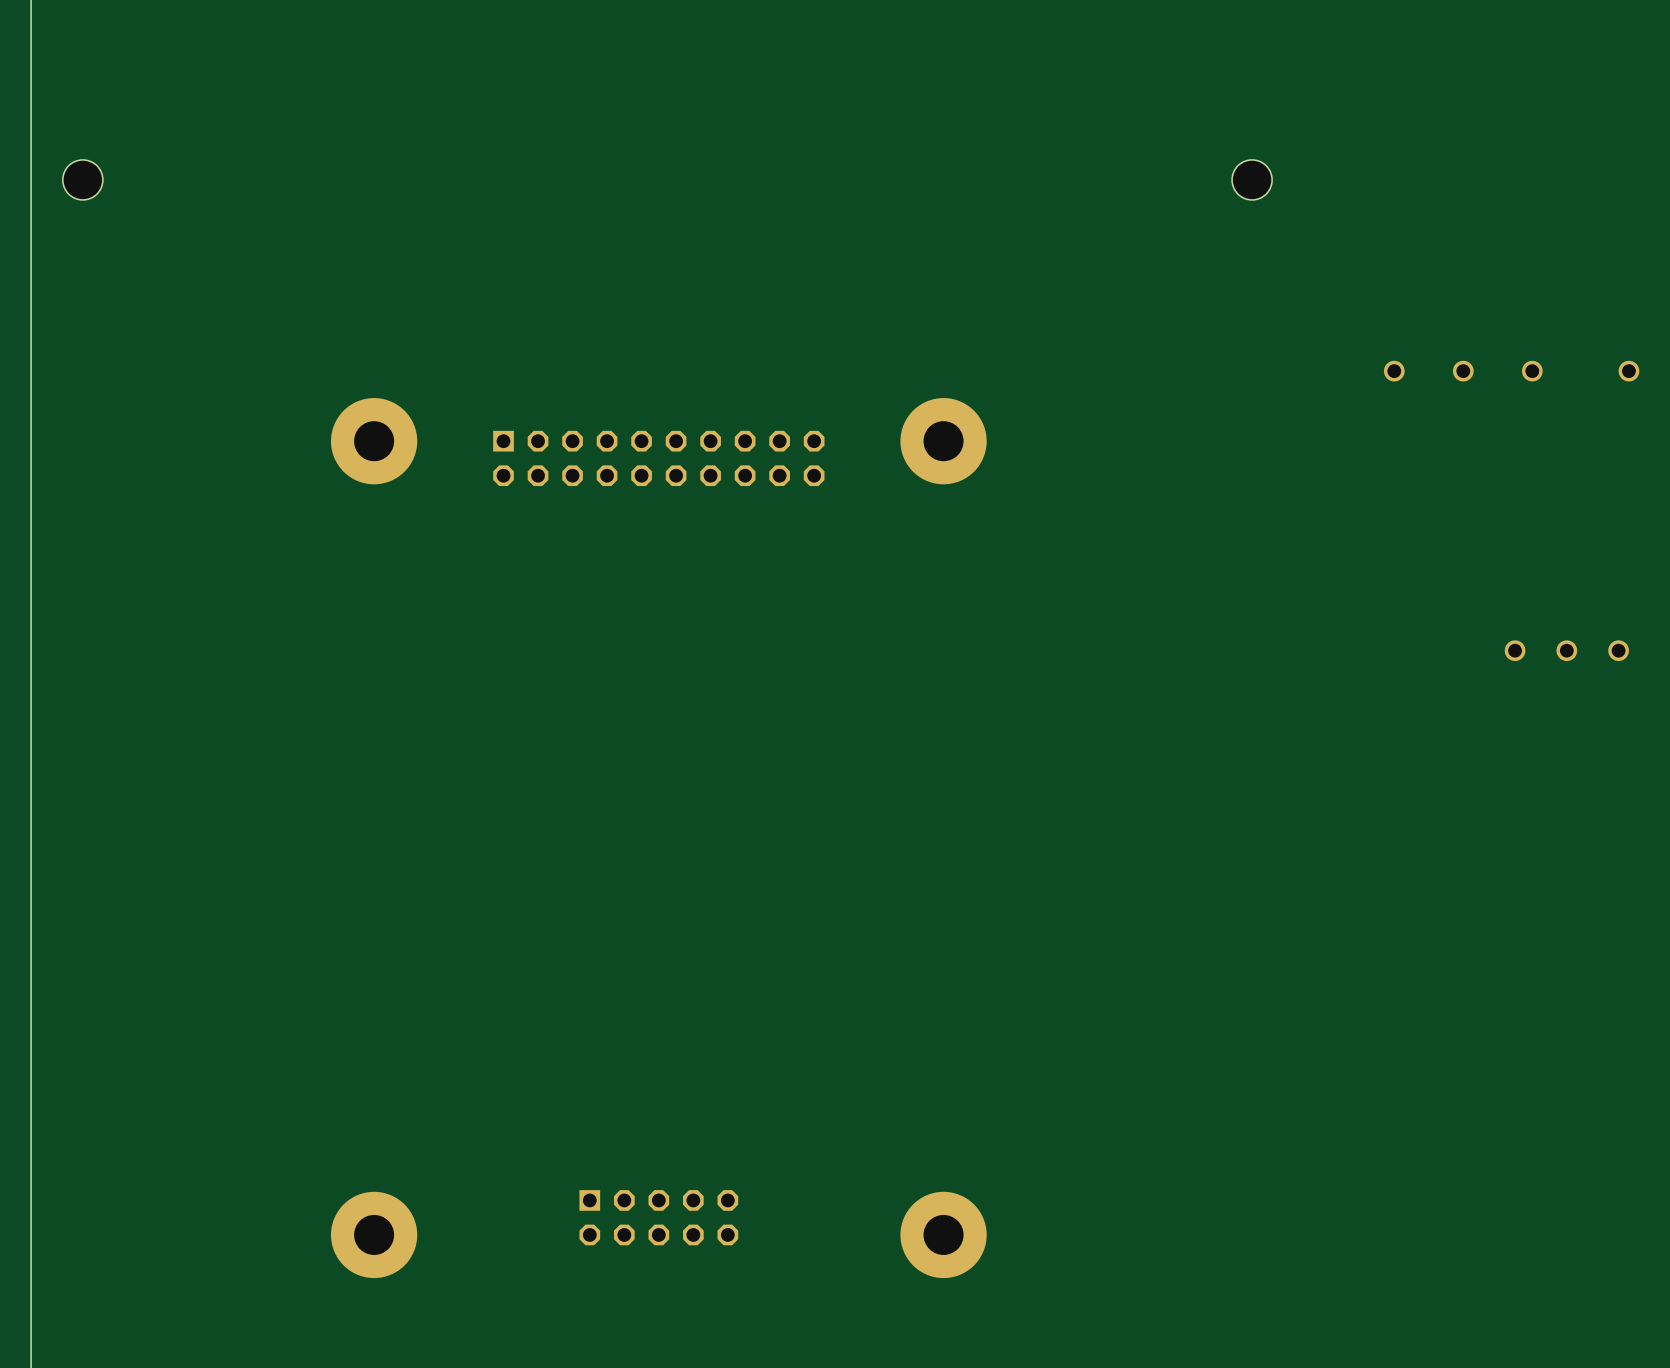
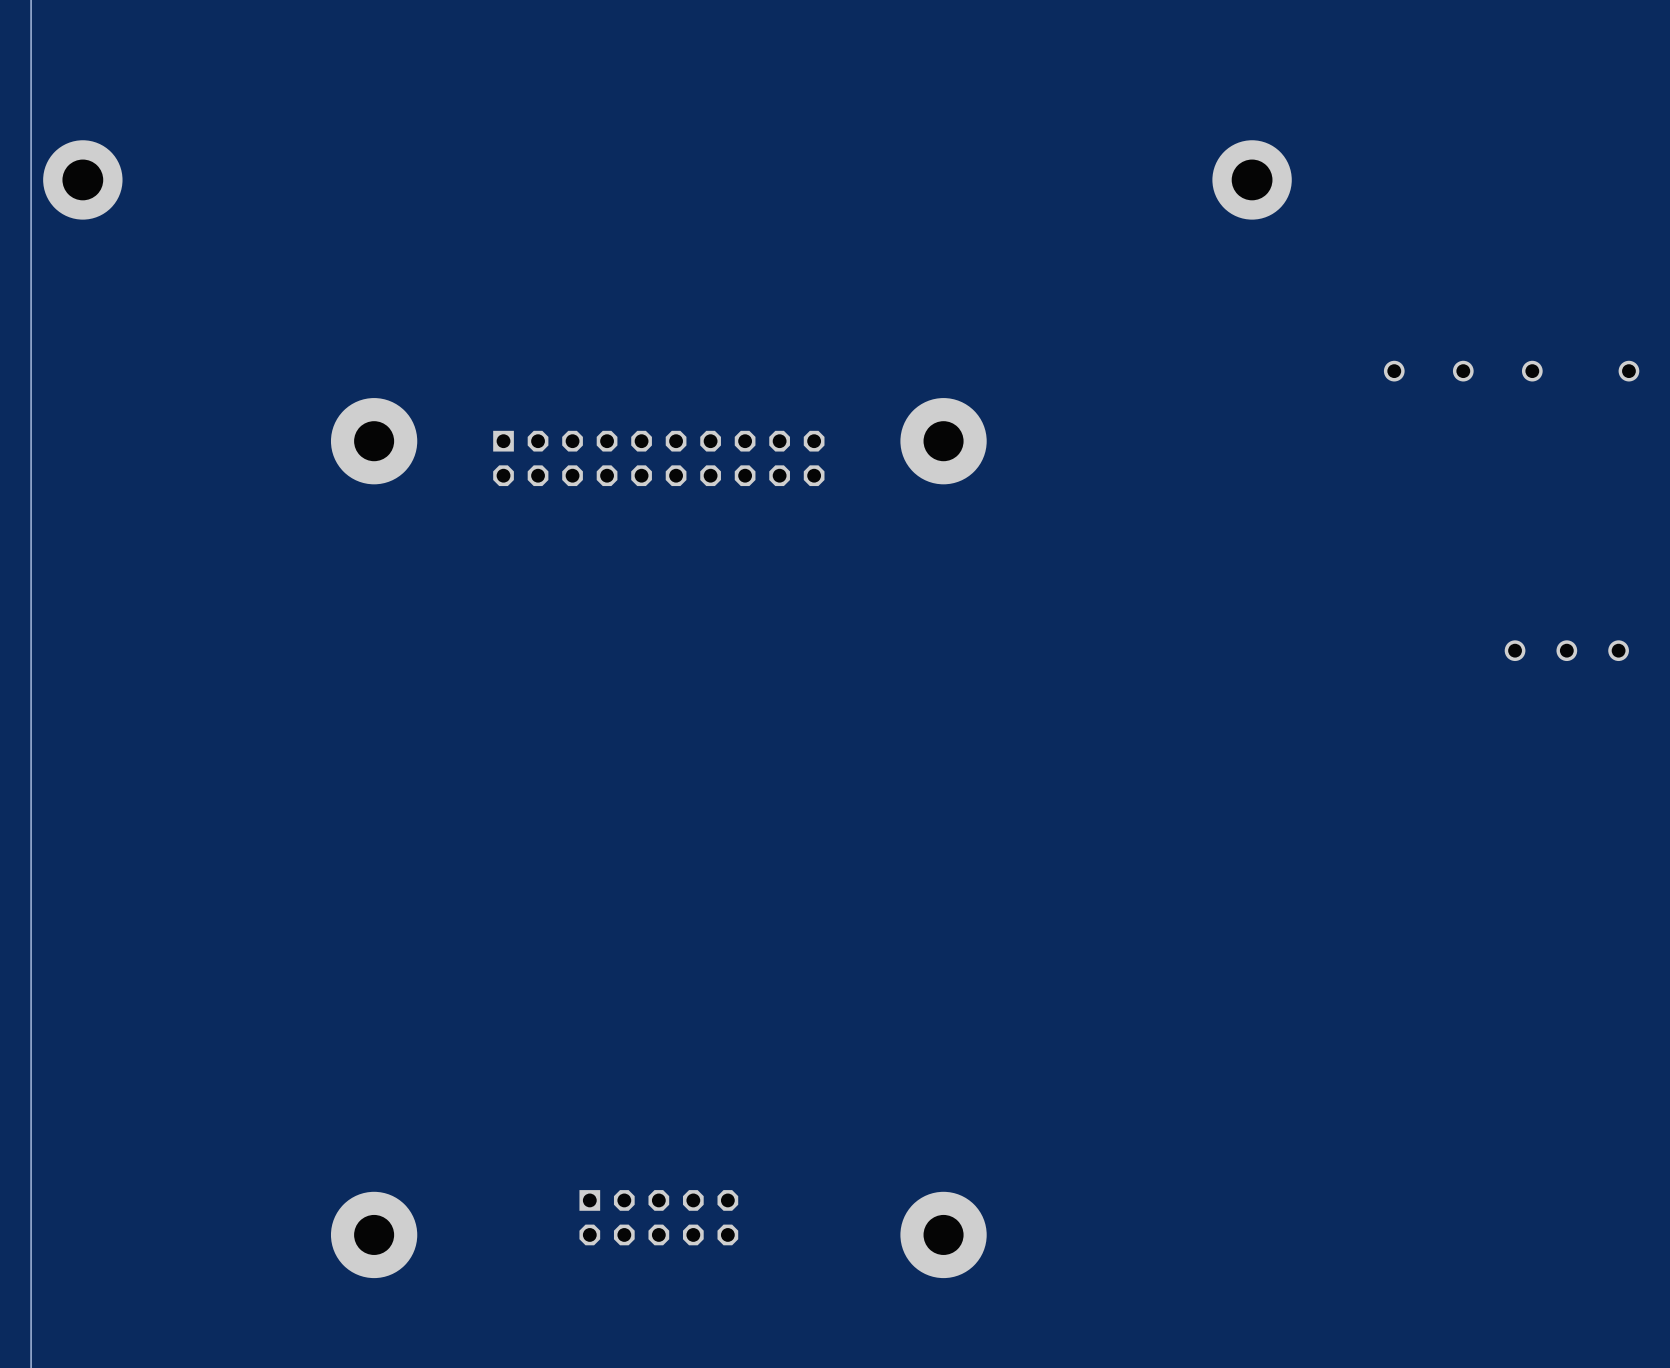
hole: (82, 179) -> none
part: none -> (82, 179)
hole: (1252, 179) -> none
part: none -> (1252, 179)

